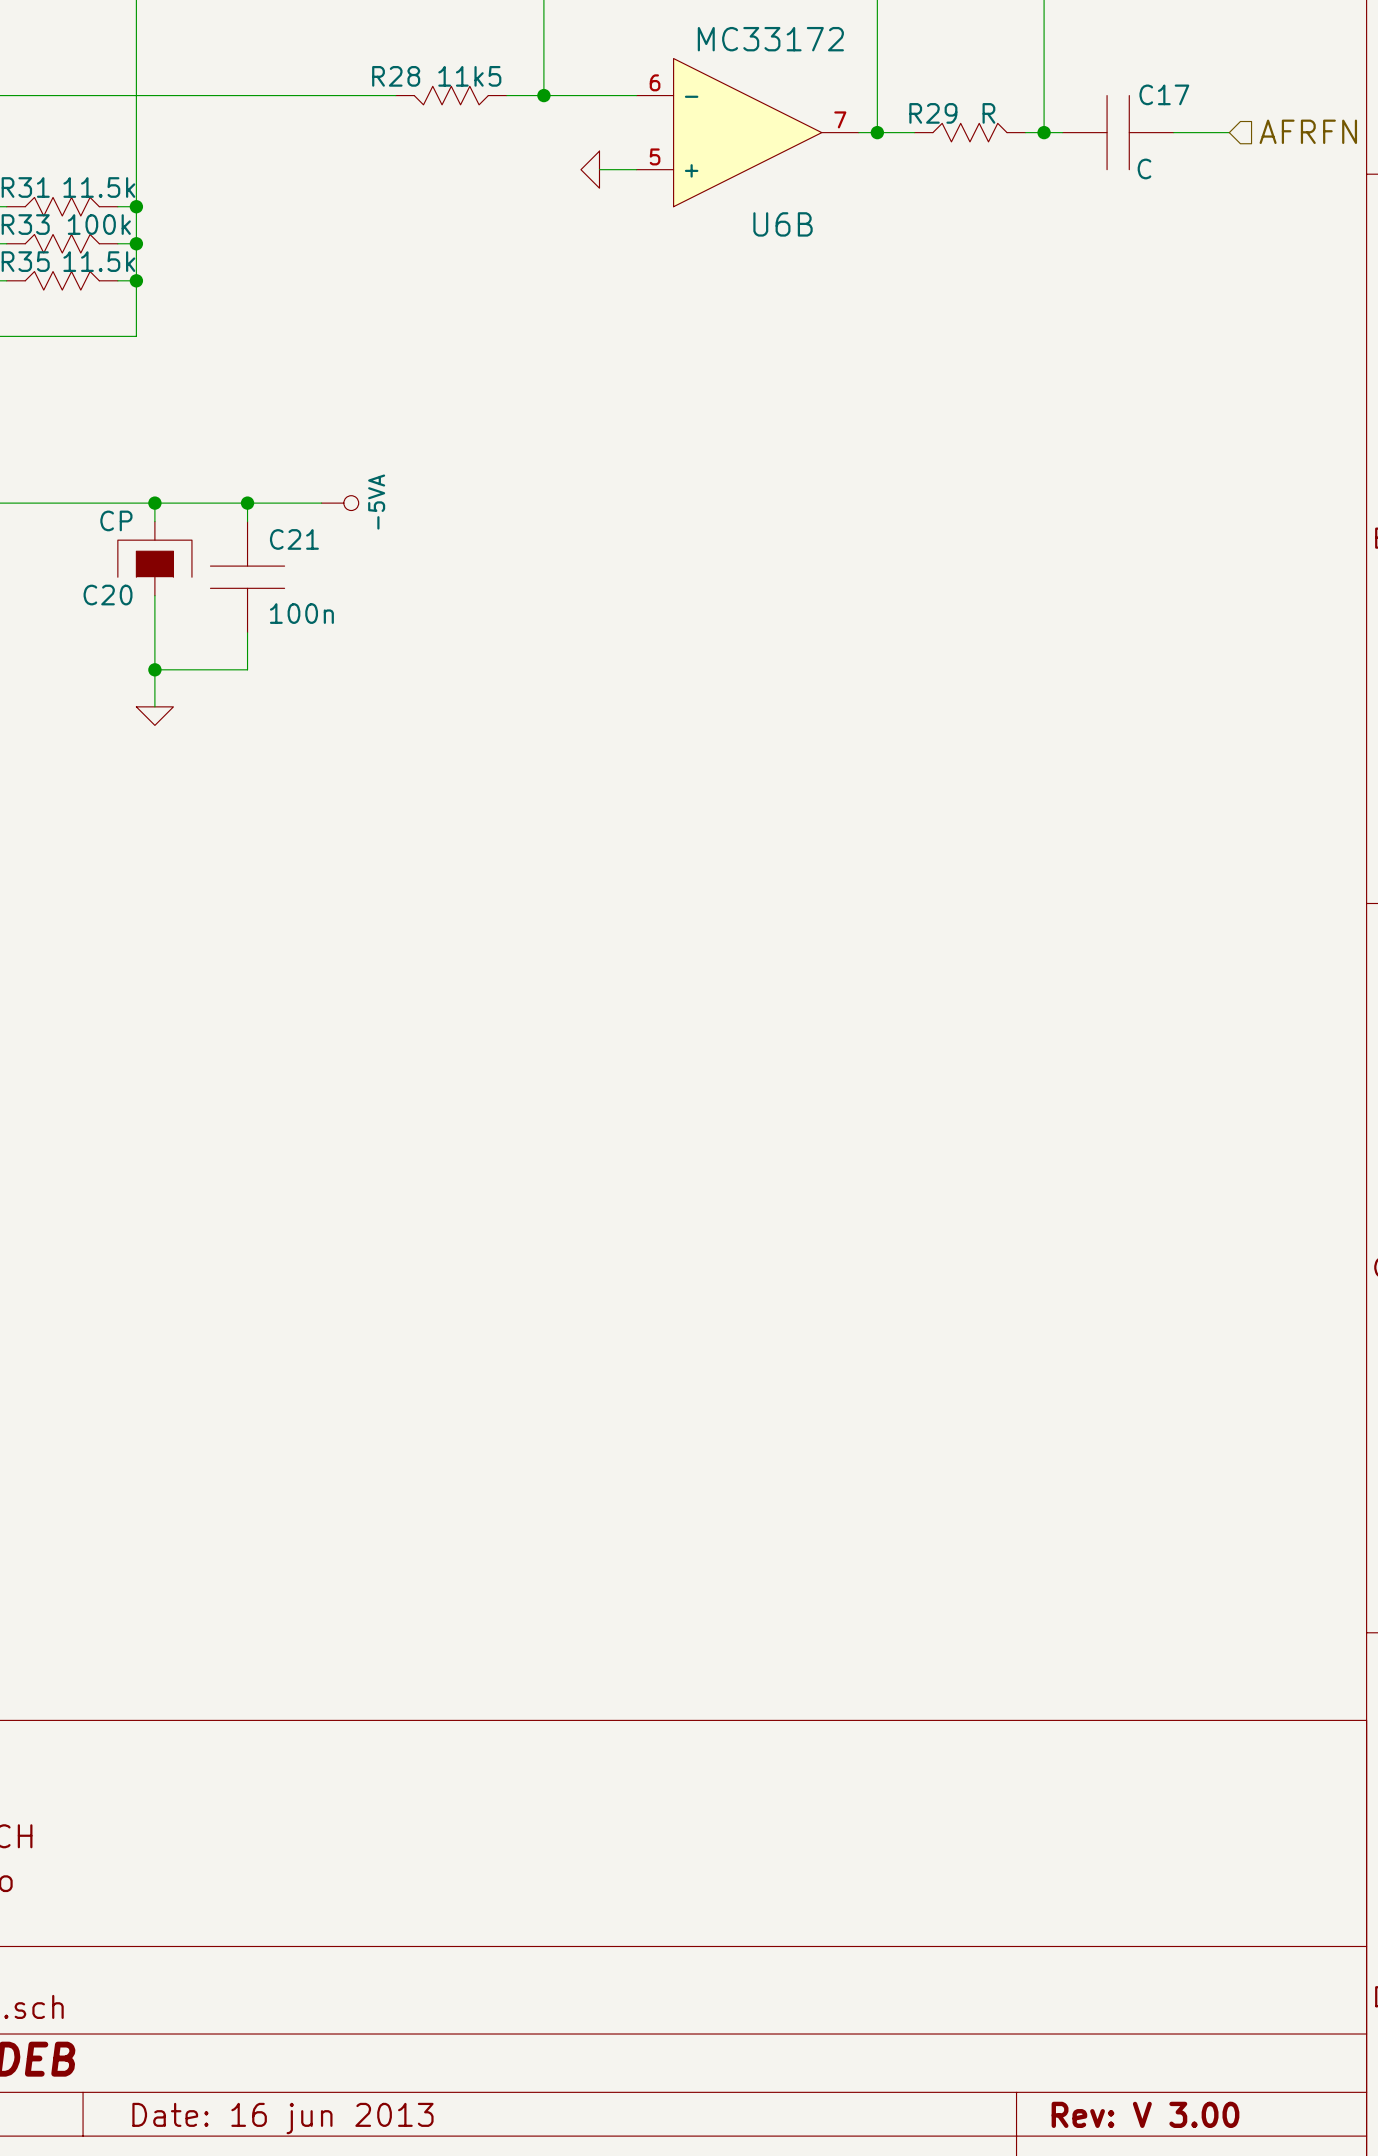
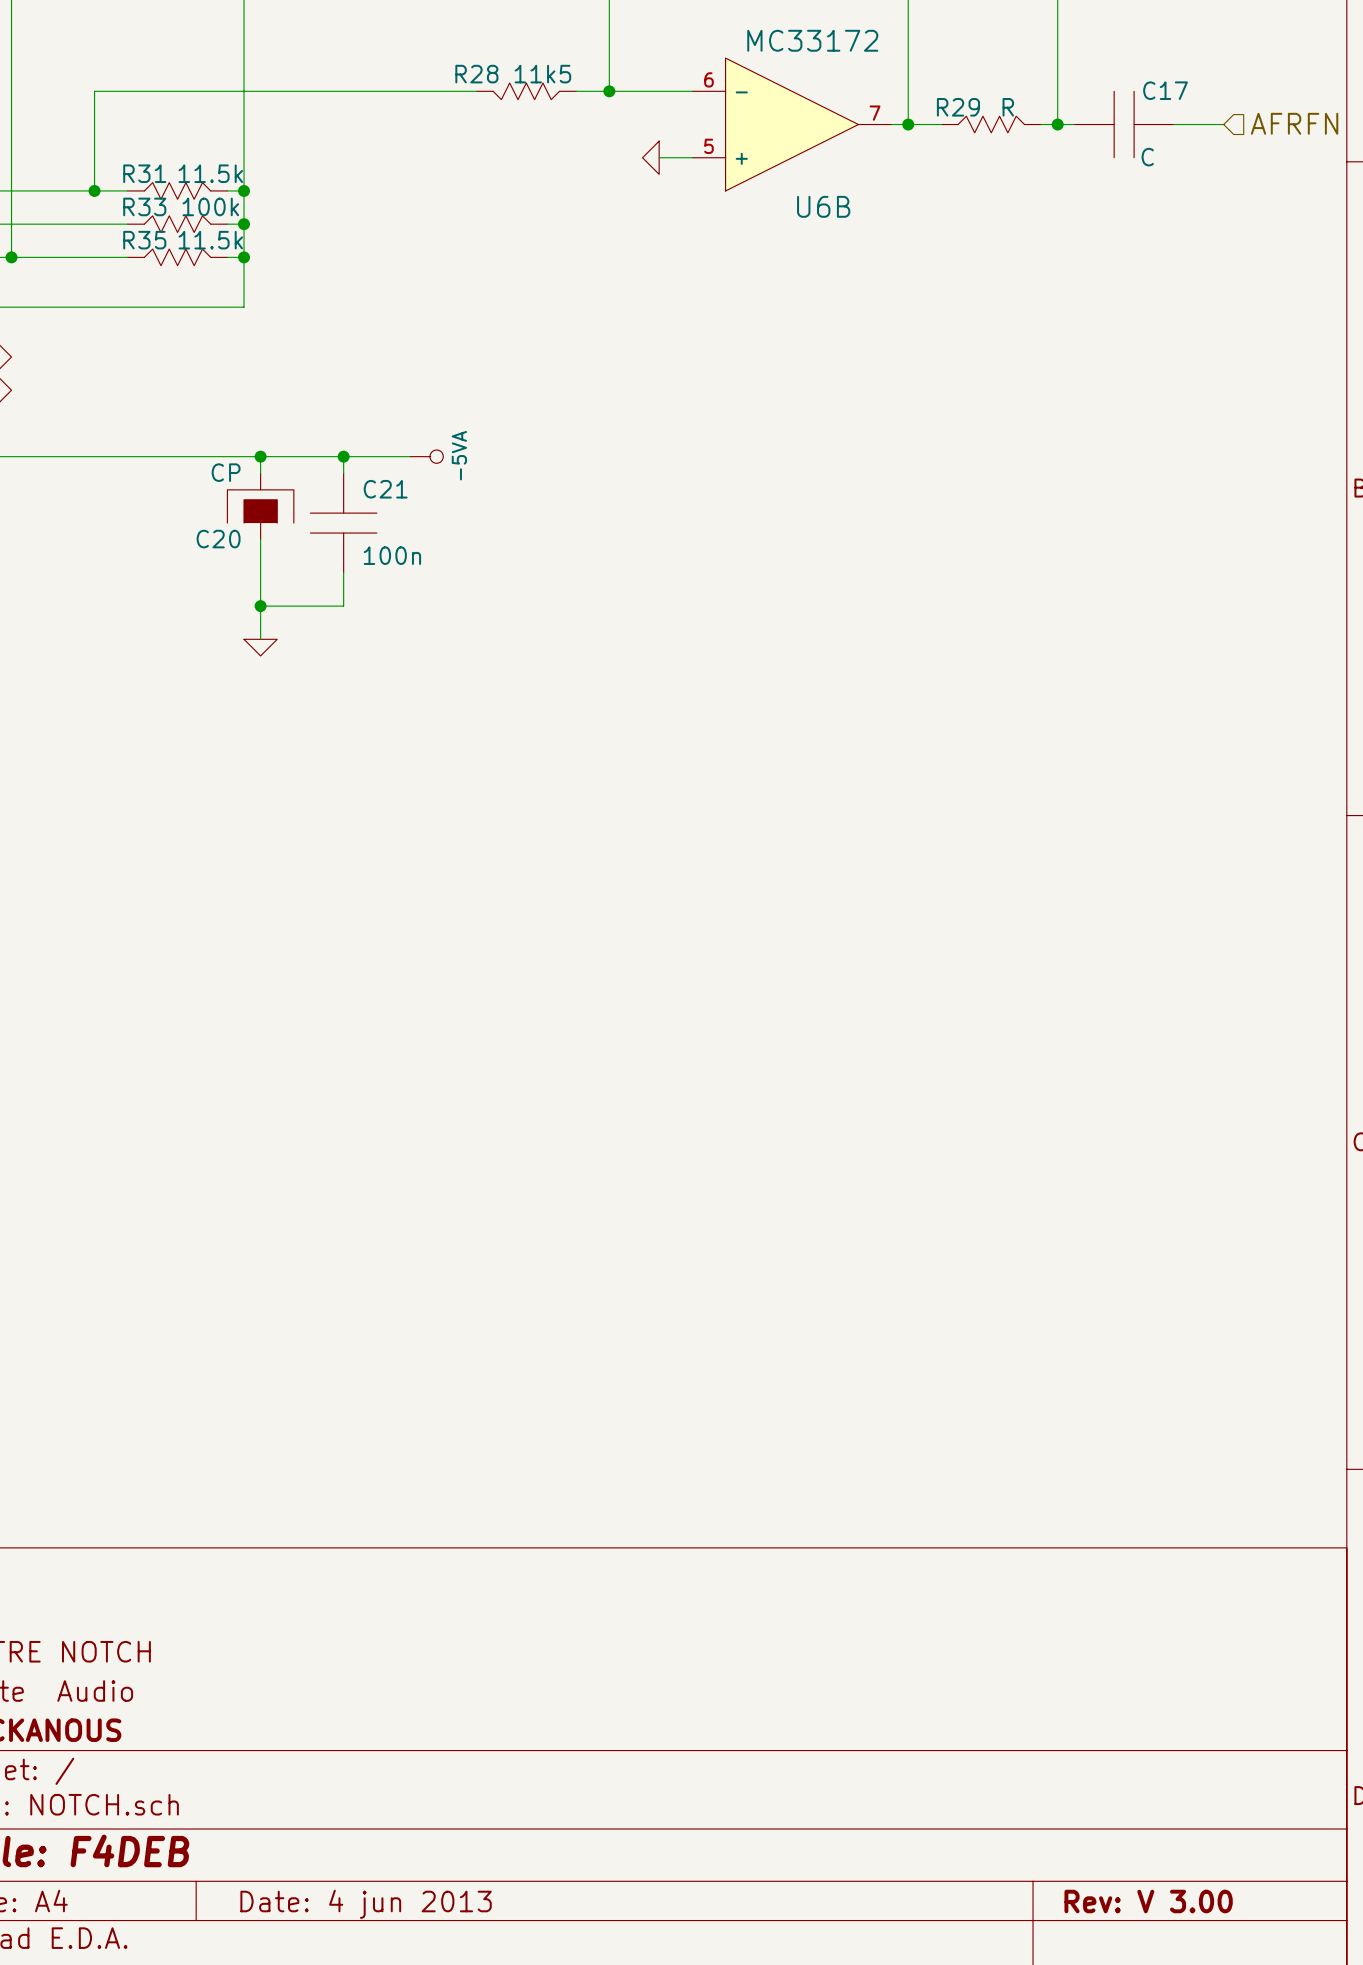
title block: Date: 16 jun 2013 (282, 2118) -> Date: 4 jun 2013 (366, 1904)

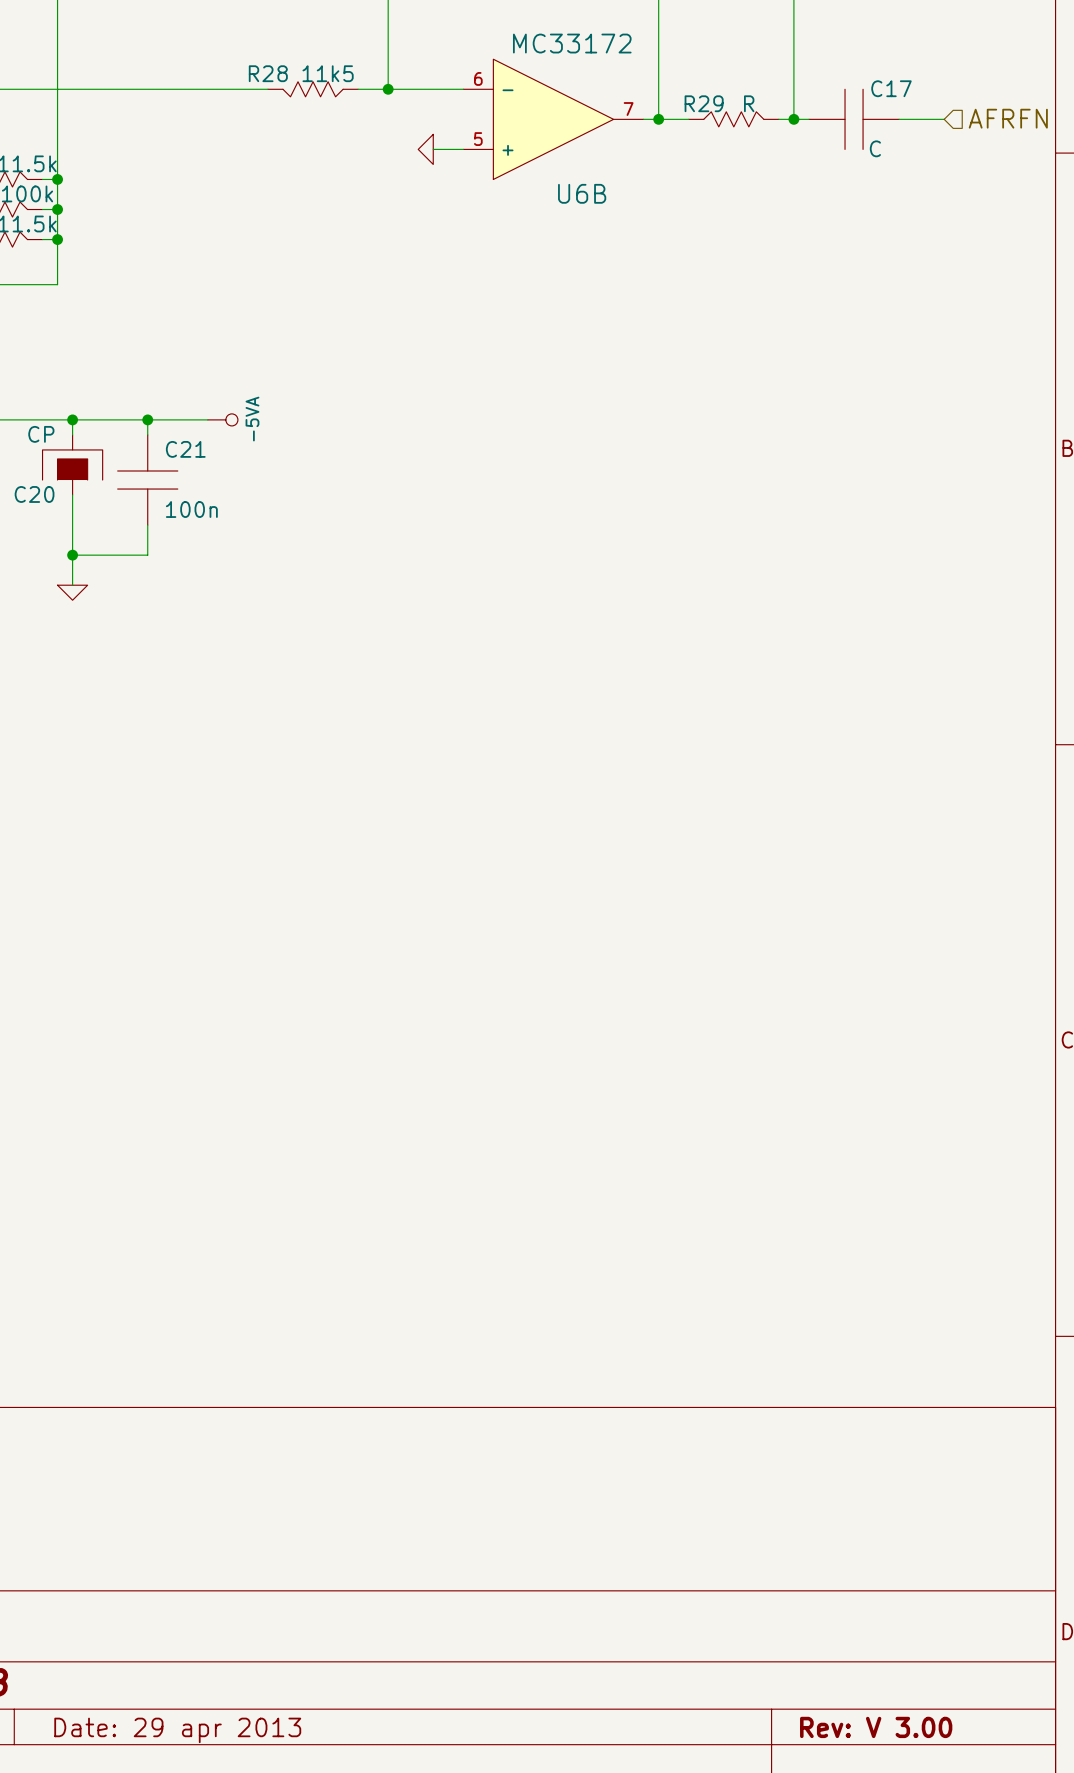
title block: Date: 4 jun 2013 (366, 1904) -> Date: 29 apr 2013 (177, 1730)

